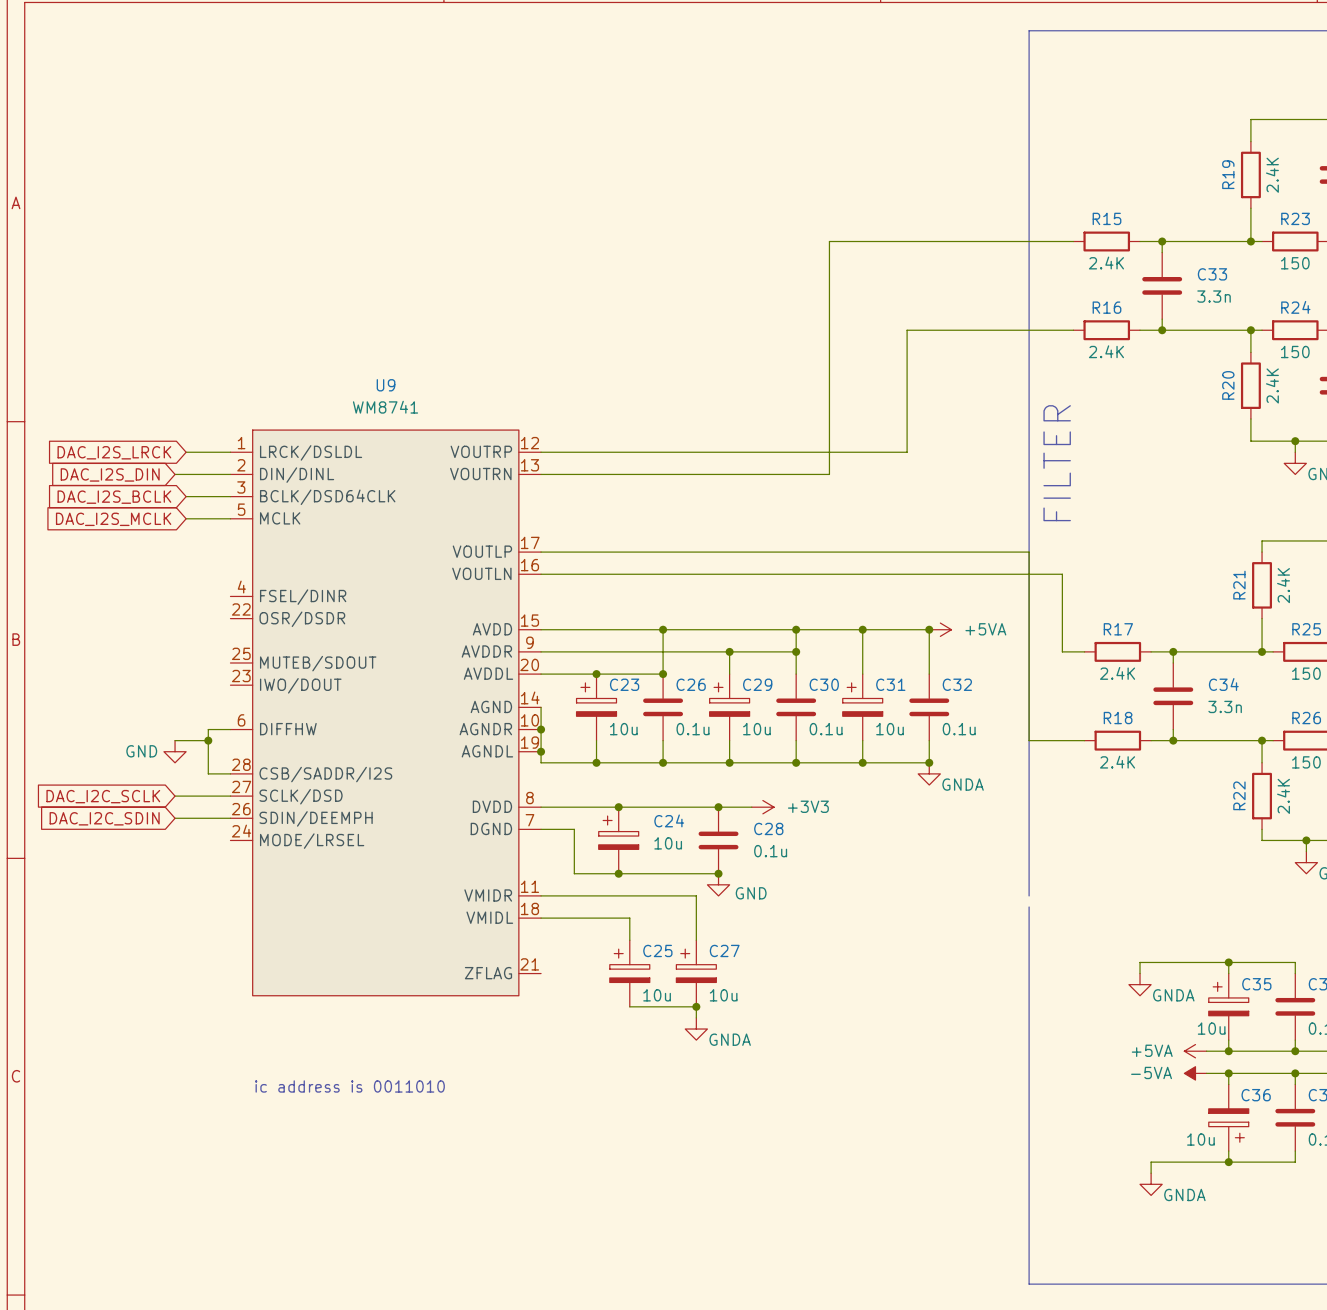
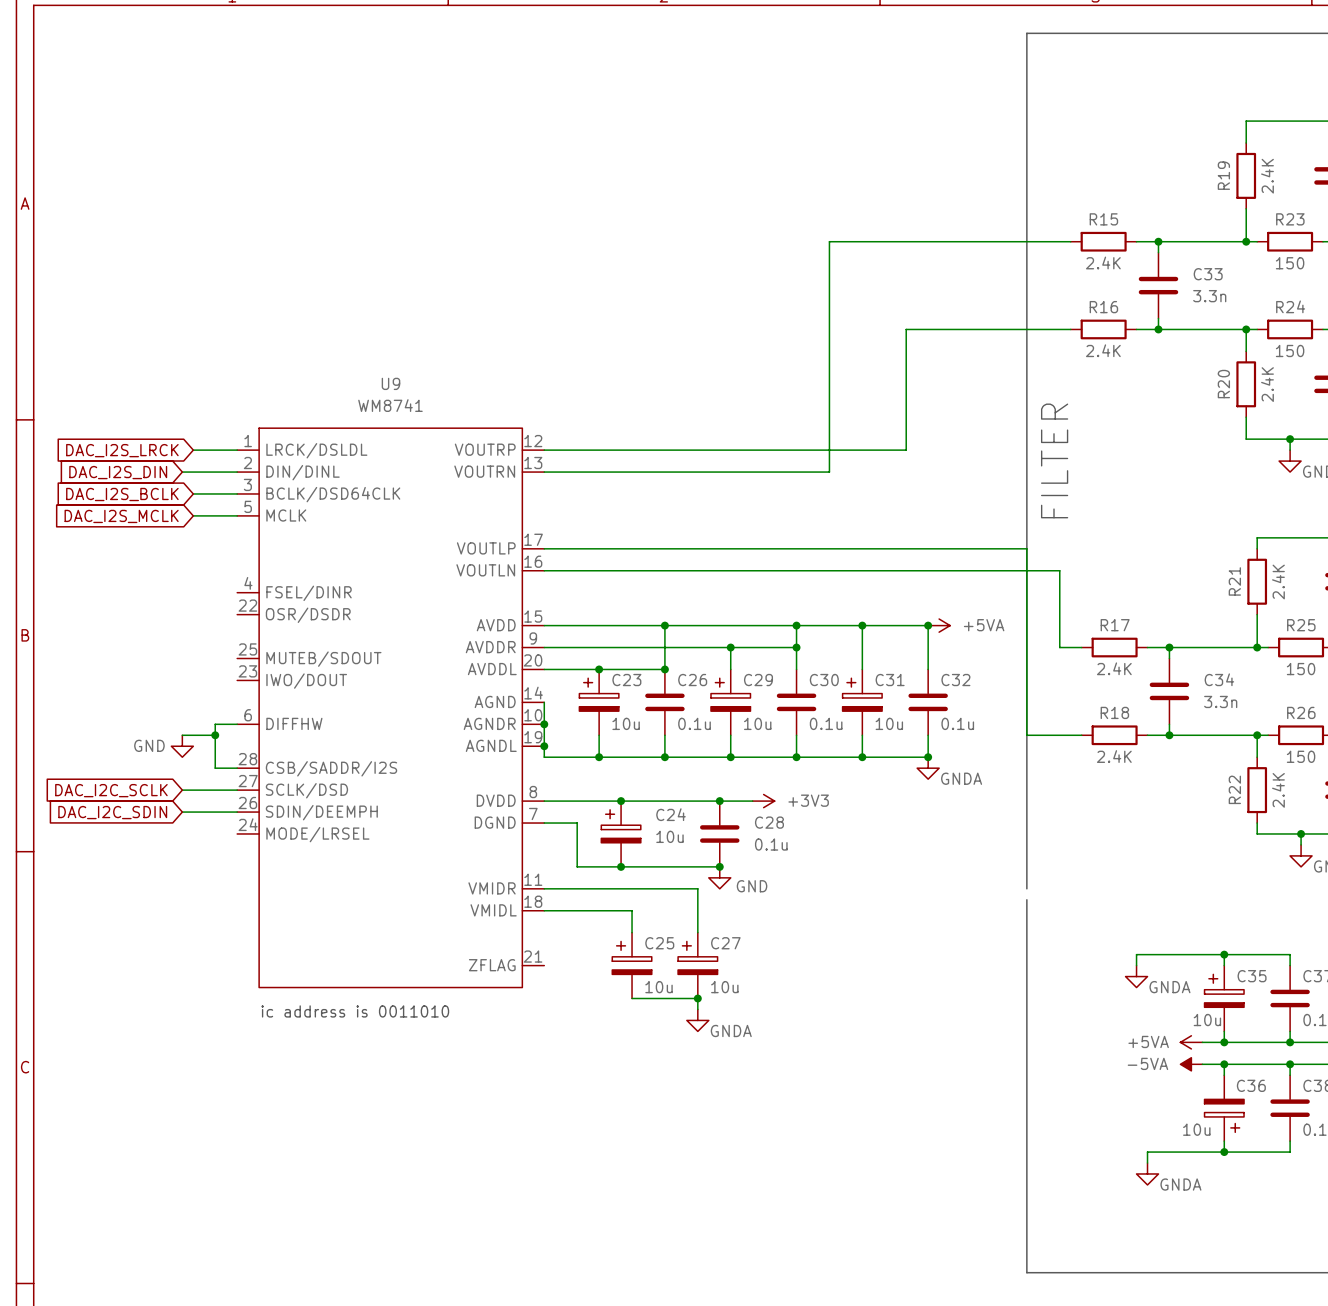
text position: ic address is 0011010 (349, 1086) -> ic address is 0011010 (355, 1011)

